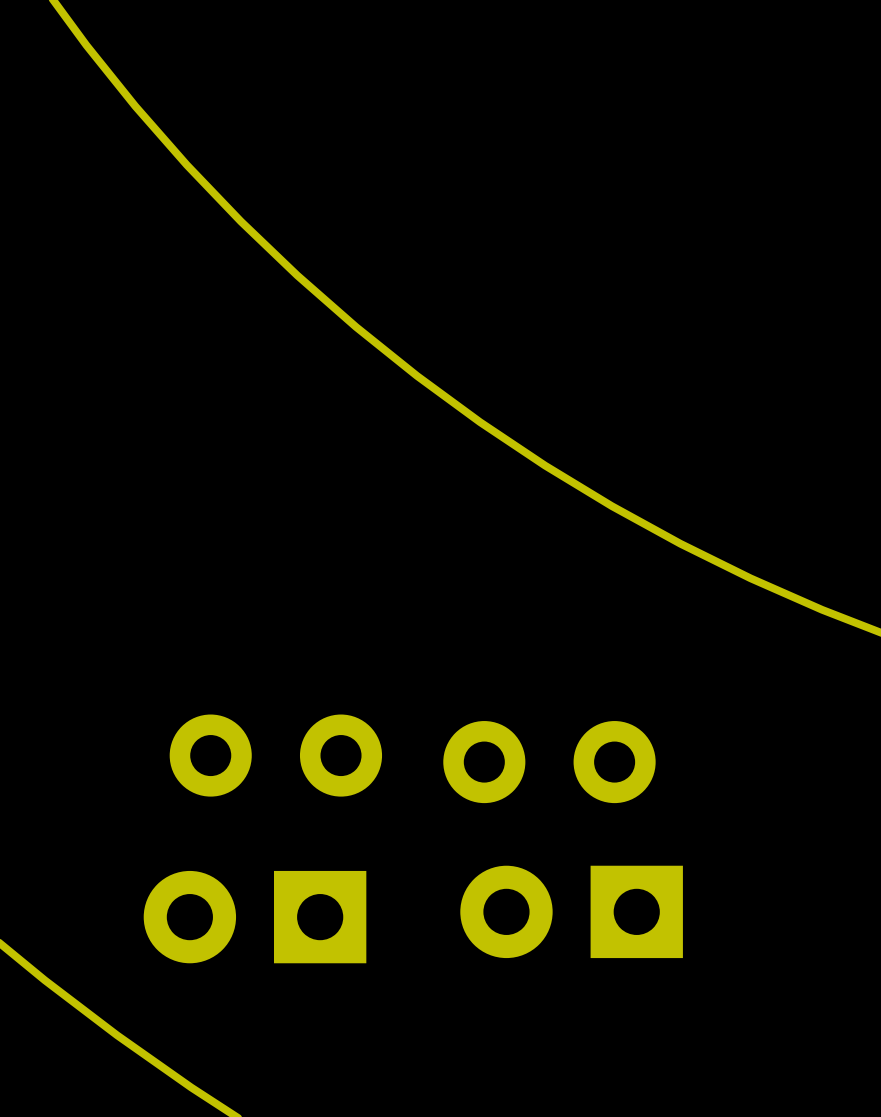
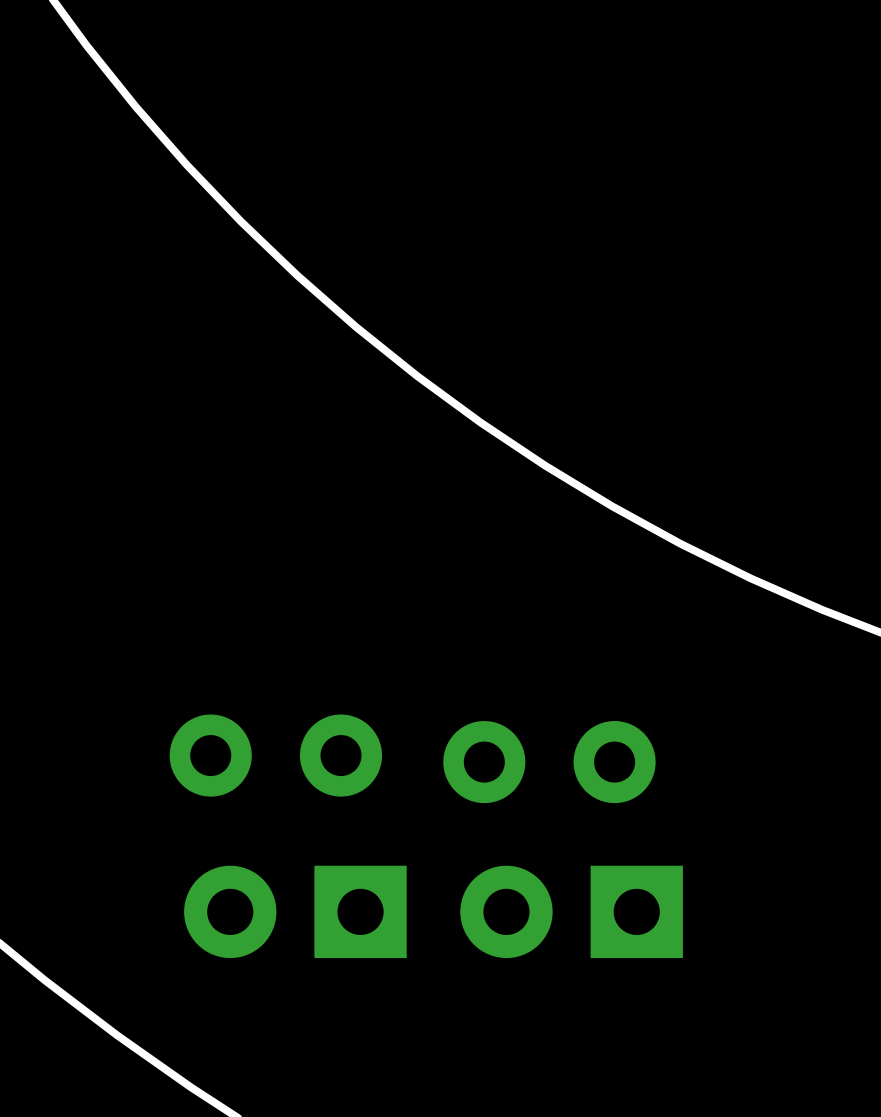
part position: (255, 917) -> (295, 911)

